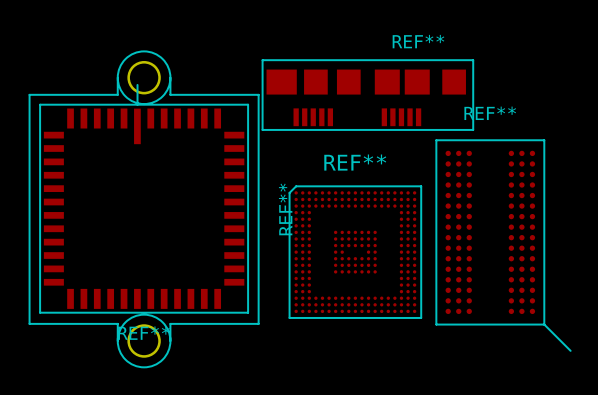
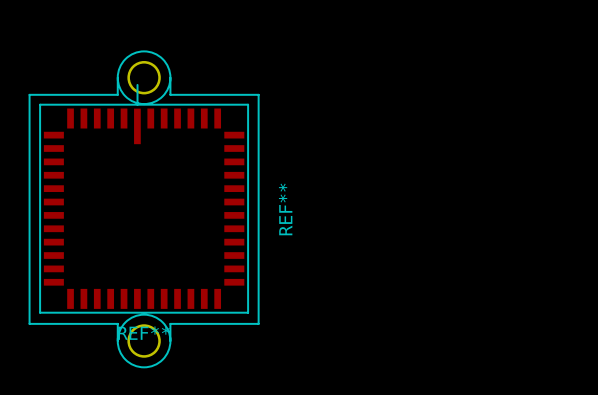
REF**: (367, 95) -> none
REF**: (503, 245) -> none
REF**: (355, 252) -> none

